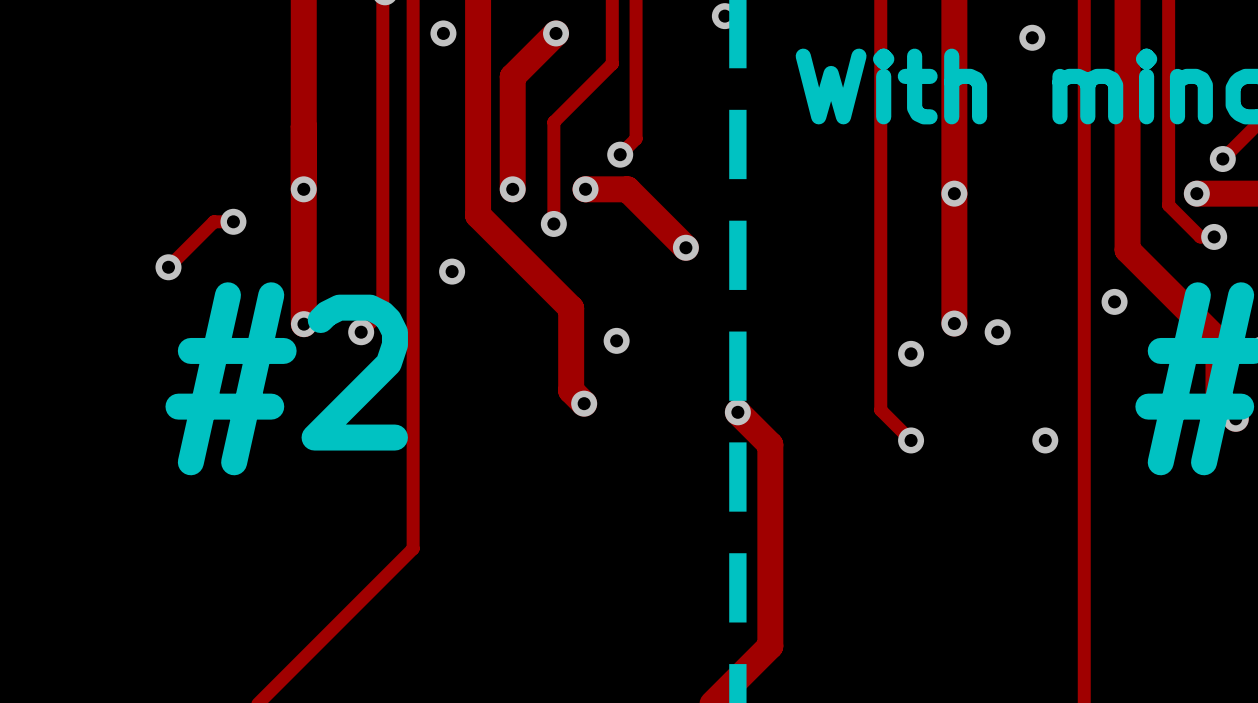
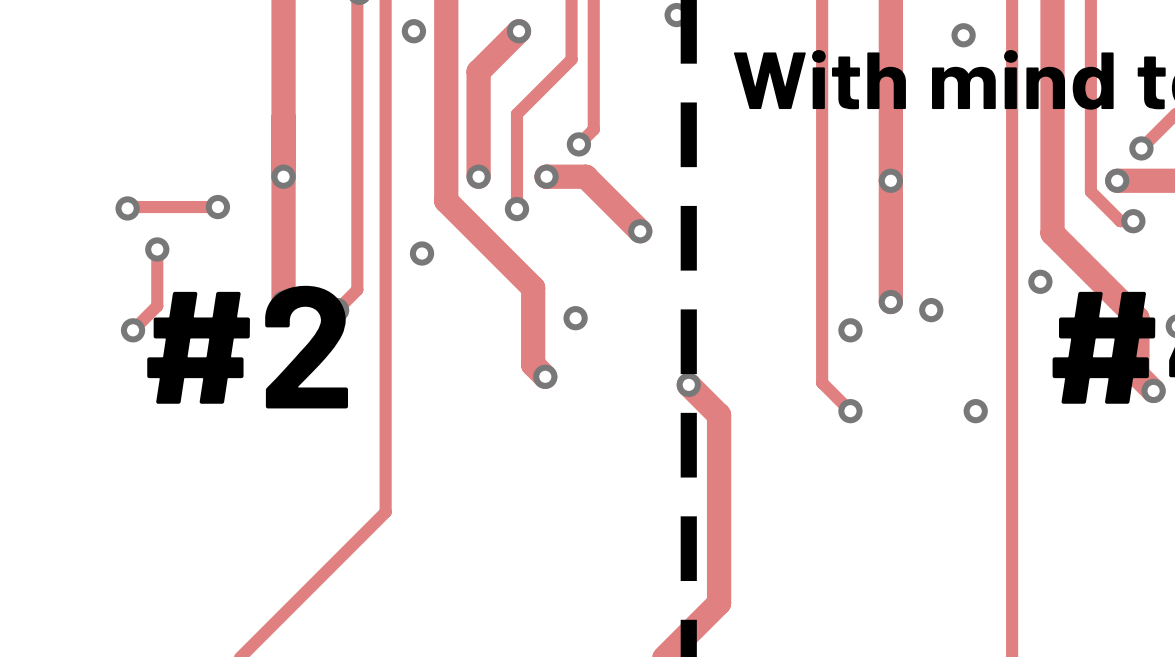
track: (213, 221) (168, 267) -> (199, 207) (127, 208)
via: none -> (127, 208)
track: none -> (157, 247) (157, 306) (133, 330)
via: none -> (133, 330)

